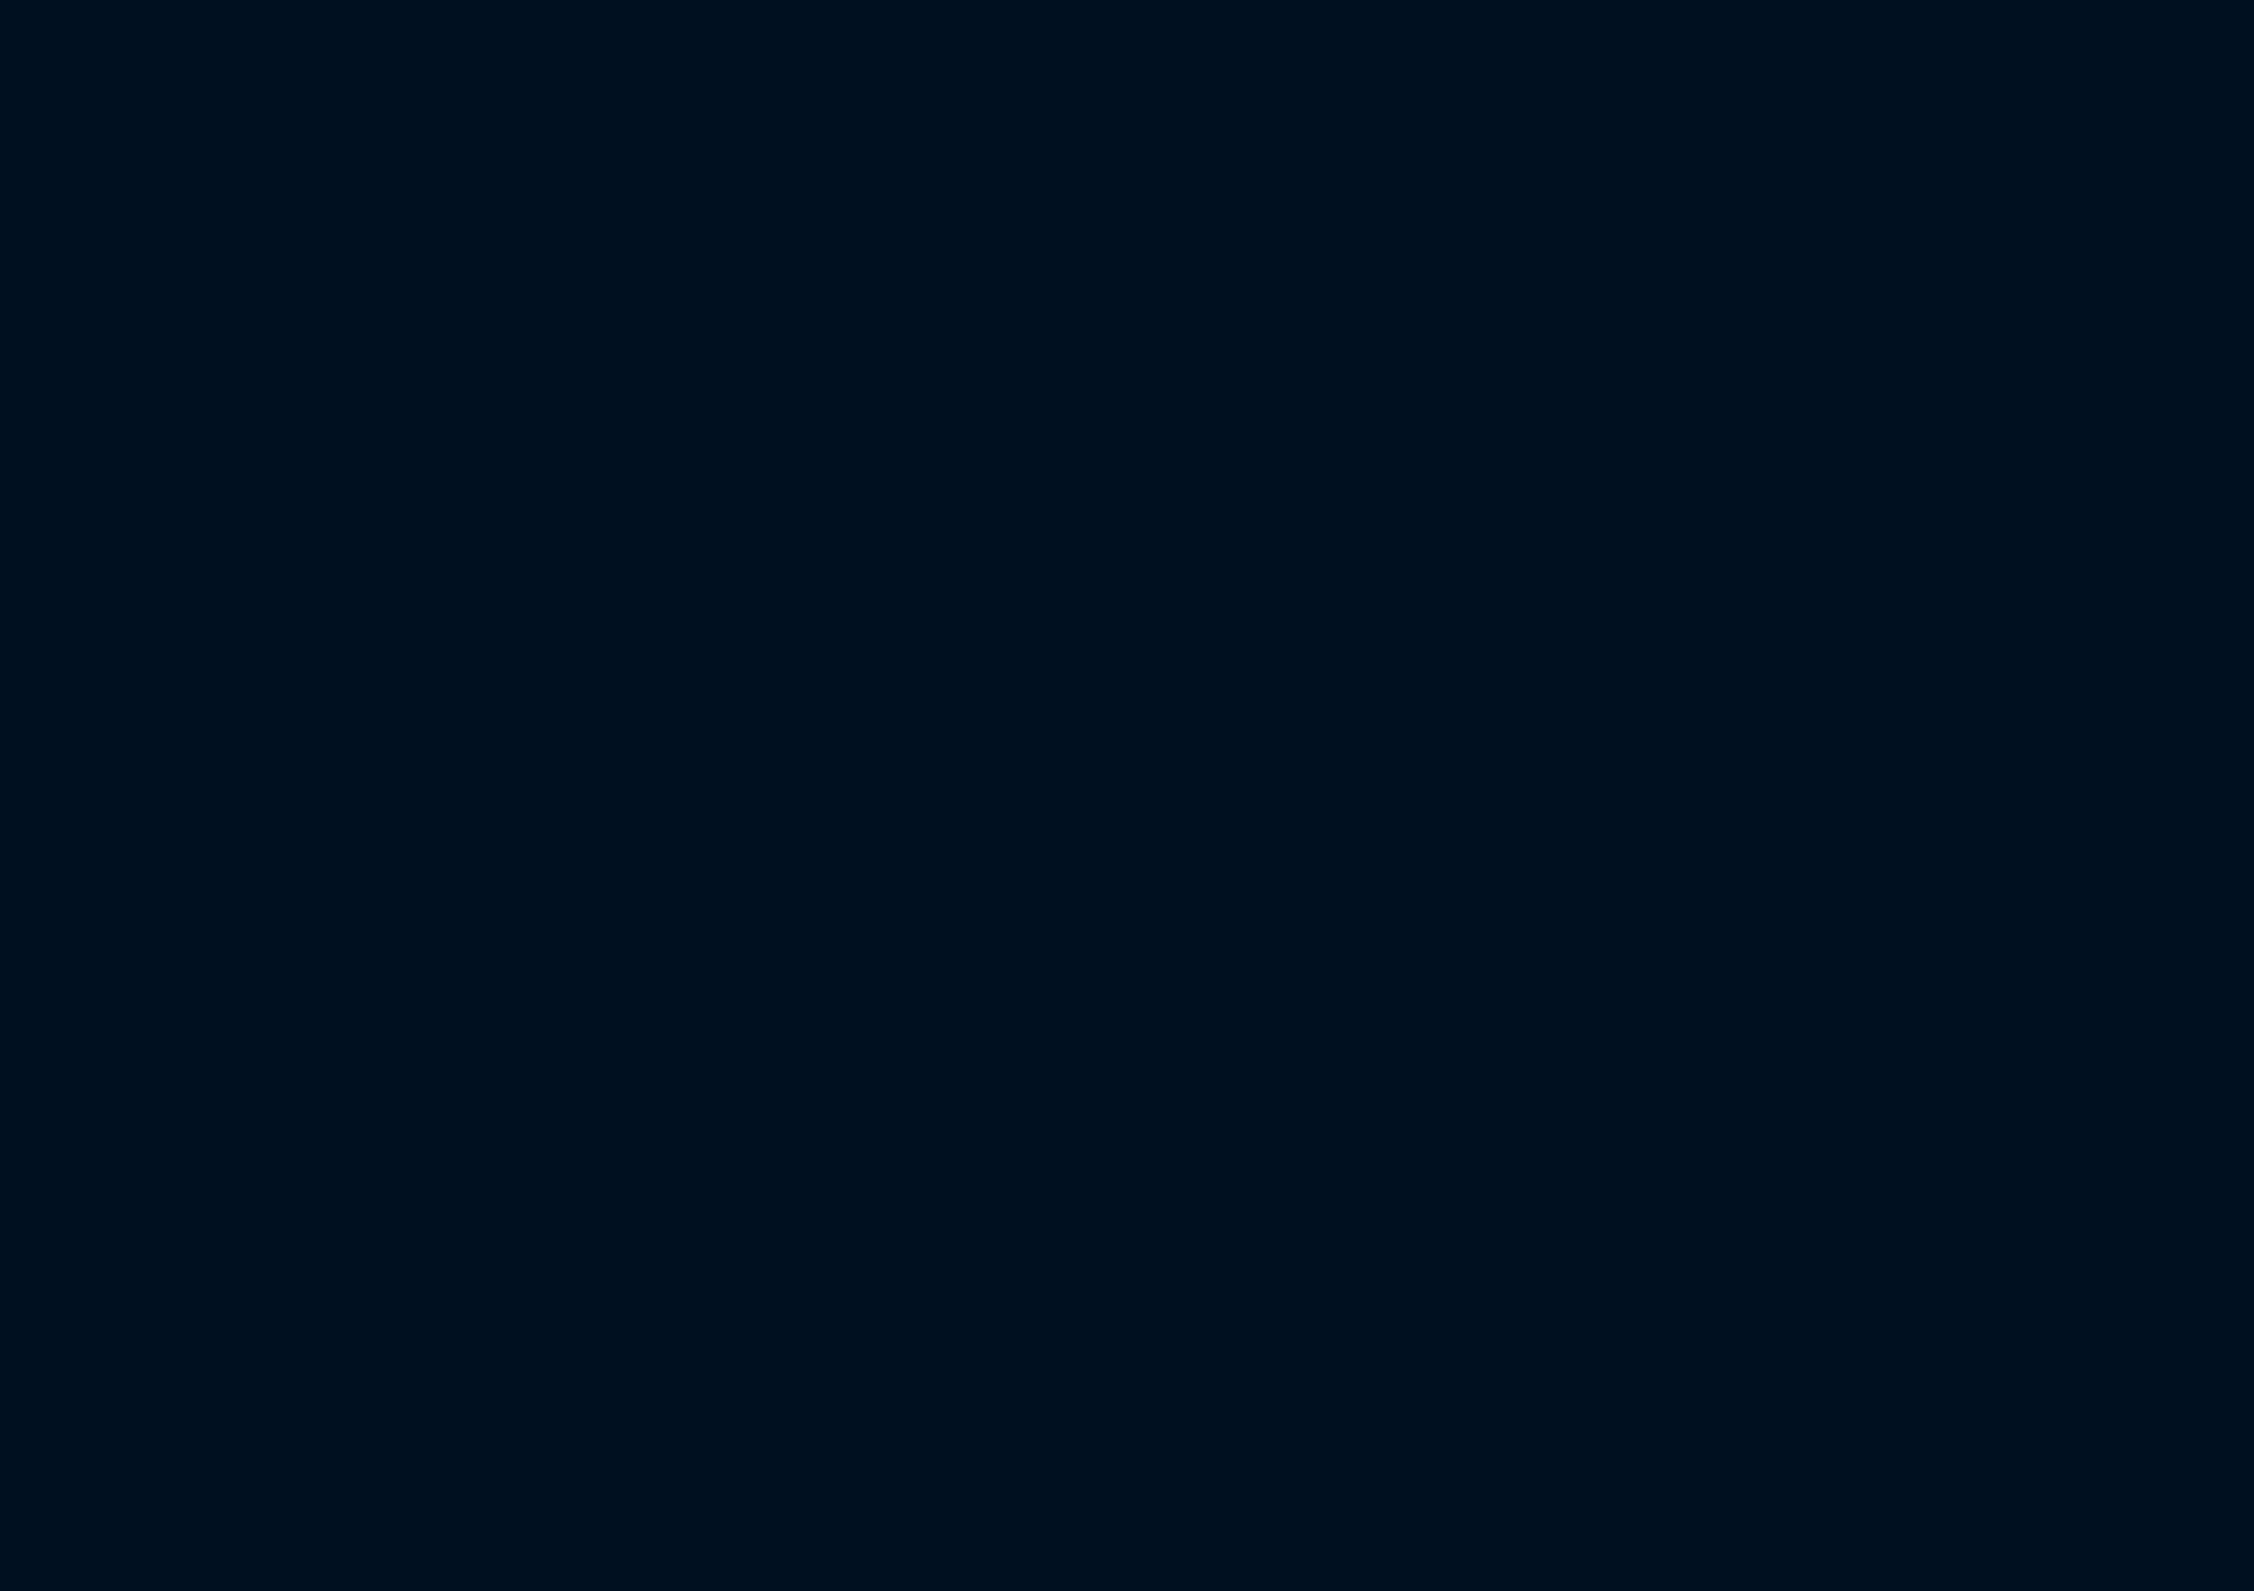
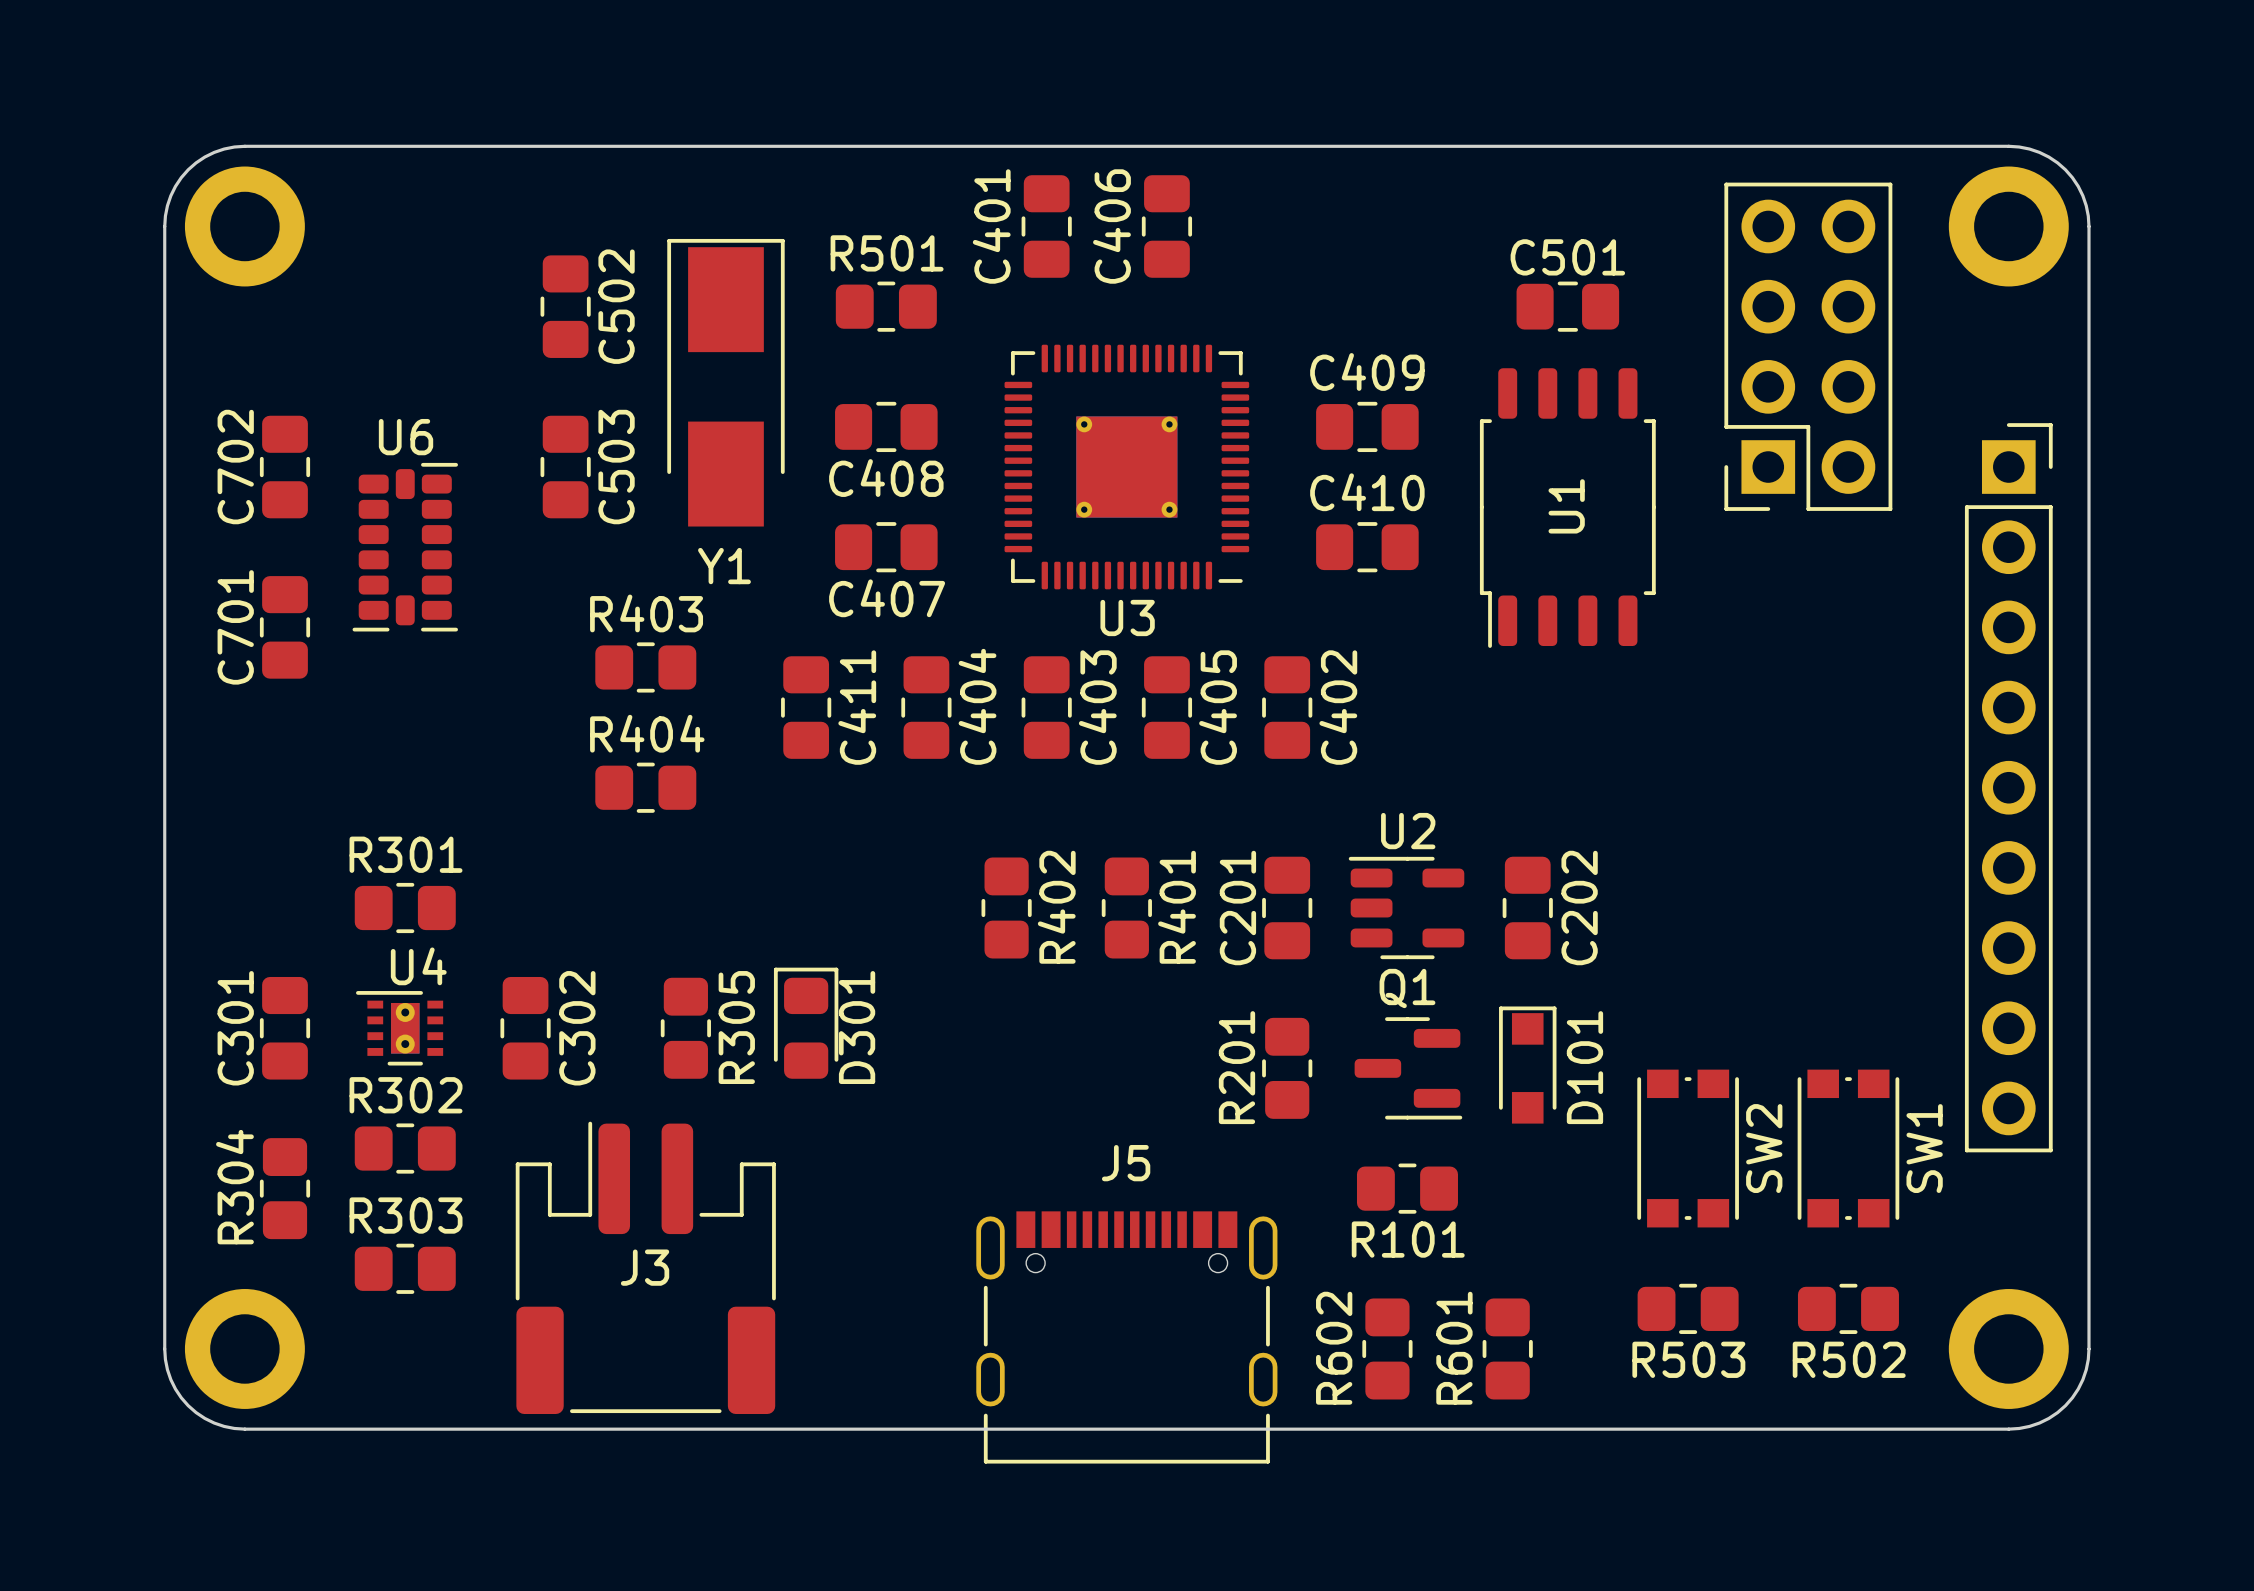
board edge: none -> (244, 146) (2008, 146) (2029, 149) (2057, 162) (2078, 186) (2086, 205) (2088, 226) (2088, 1348) (2082, 1379) (2072, 1397) (2057, 1412) (2039, 1423) (2008, 1429) (244, 1429) (214, 1423) (196, 1412) (175, 1389) (167, 1369) (164, 1348) (164, 226) (170, 195) (188, 169) (214, 152) (244, 146)
part: none -> (244, 226)
C401: none -> (1046, 226)
C406: none -> (1166, 226)
part: none -> (2008, 226)
C502: none -> (565, 306)
R501: none -> (886, 306)
C501: none -> (1567, 306)
part: none -> (1808, 346)
Y1: none -> (725, 382)
C408: none -> (886, 426)
C409: none -> (1367, 426)
C702: none -> (285, 467)
C503: none -> (565, 467)
U3: none -> (1126, 467)
U1: none -> (1567, 508)
U6: none -> (405, 547)
C407: none -> (886, 547)
C410: none -> (1367, 547)
C701: none -> (285, 627)
R403: none -> (645, 667)
C411: none -> (806, 707)
C404: none -> (926, 707)
C403: none -> (1046, 707)
C405: none -> (1166, 707)
C402: none -> (1287, 707)
R404: none -> (645, 787)
part: none -> (2008, 787)
R301: none -> (405, 908)
R402: none -> (1006, 908)
R401: none -> (1126, 908)
C201: none -> (1287, 908)
U2: none -> (1406, 908)
C202: none -> (1527, 908)
D301: none -> (806, 1023)
C301: none -> (285, 1028)
U4: none -> (399, 1028)
C302: none -> (525, 1028)
R305: none -> (685, 1028)
D101: none -> (1527, 1065)
R201: none -> (1287, 1068)
Q1: none -> (1408, 1068)
R302: none -> (405, 1148)
SW2: none -> (1688, 1148)
SW1: none -> (1848, 1148)
R304: none -> (285, 1188)
R101: none -> (1407, 1188)
J3: none -> (645, 1267)
R303: none -> (405, 1268)
R503: none -> (1688, 1308)
R502: none -> (1848, 1308)
J5: none -> (1126, 1337)
part: none -> (244, 1348)
R602: none -> (1387, 1348)
R601: none -> (1507, 1348)
part: none -> (2008, 1348)

